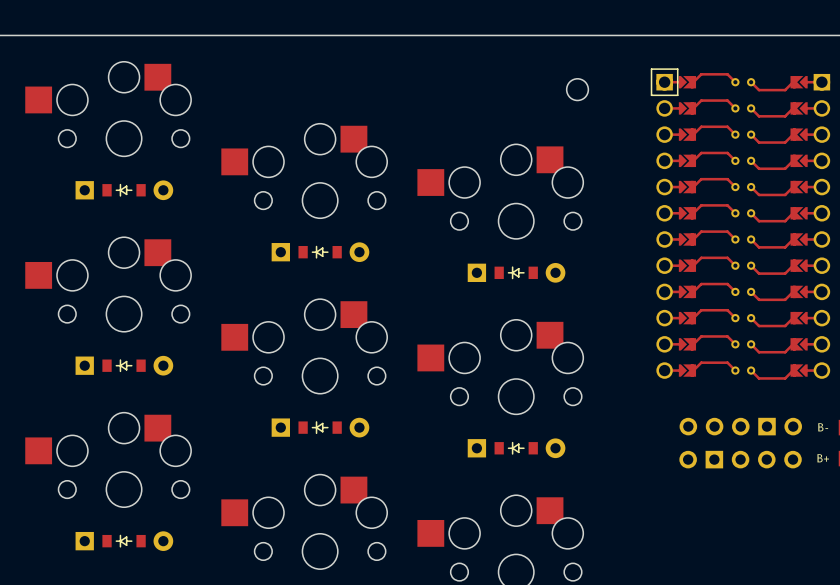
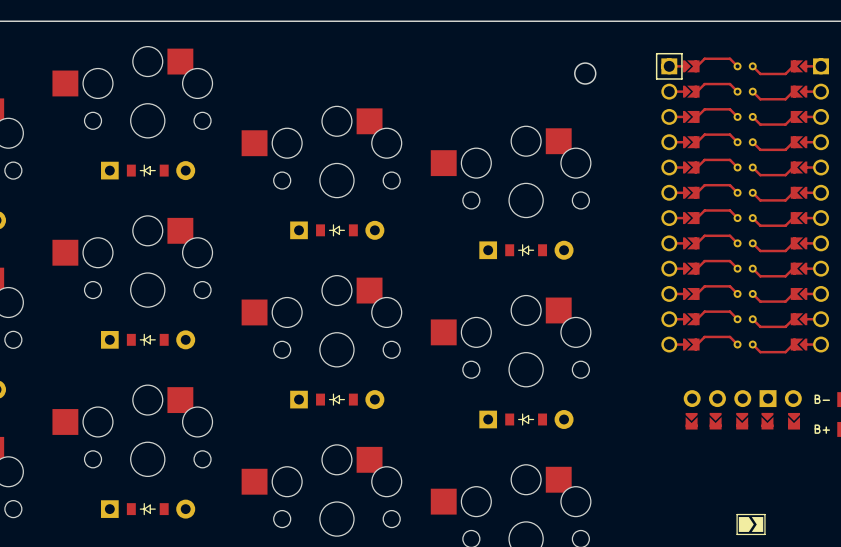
part: none -> (691, 416)
part: none -> (715, 416)
part: none -> (742, 416)
part: none -> (767, 416)
part: none -> (794, 416)
part: none -> (691, 423)
part: none -> (715, 423)
part: none -> (742, 423)
part: none -> (767, 423)
part: none -> (794, 423)
part: (740, 459) -> none
drawing: none -> [736, 513, 766, 536]

